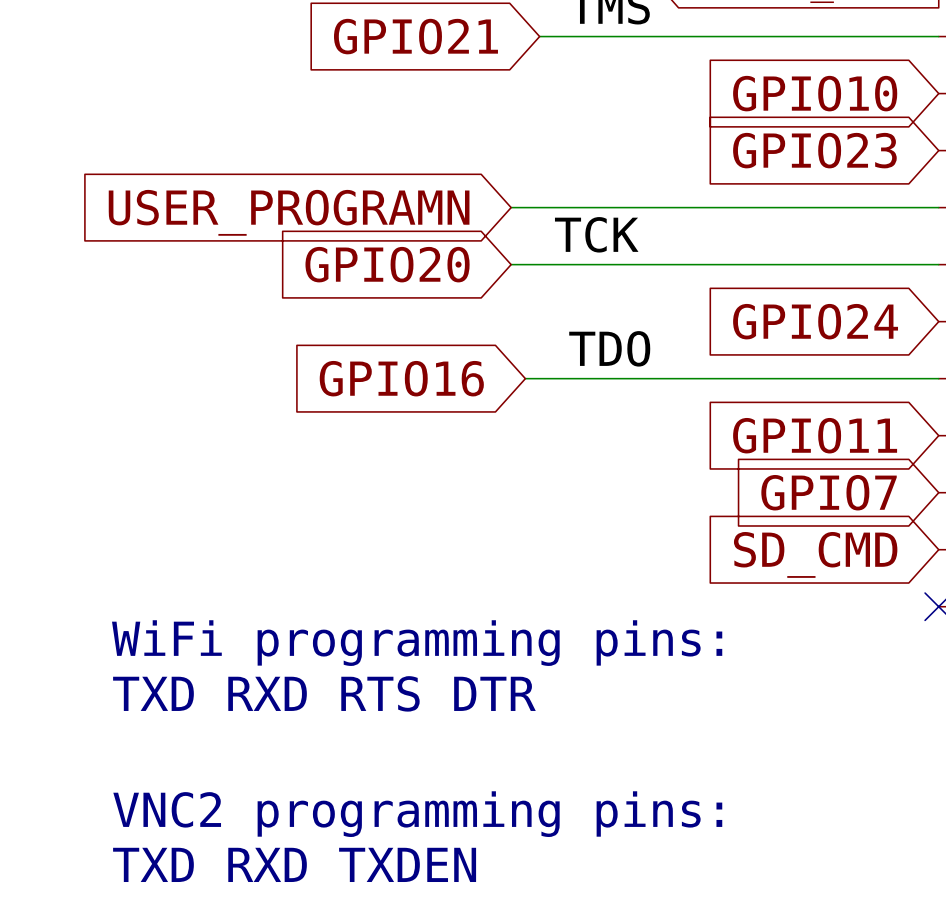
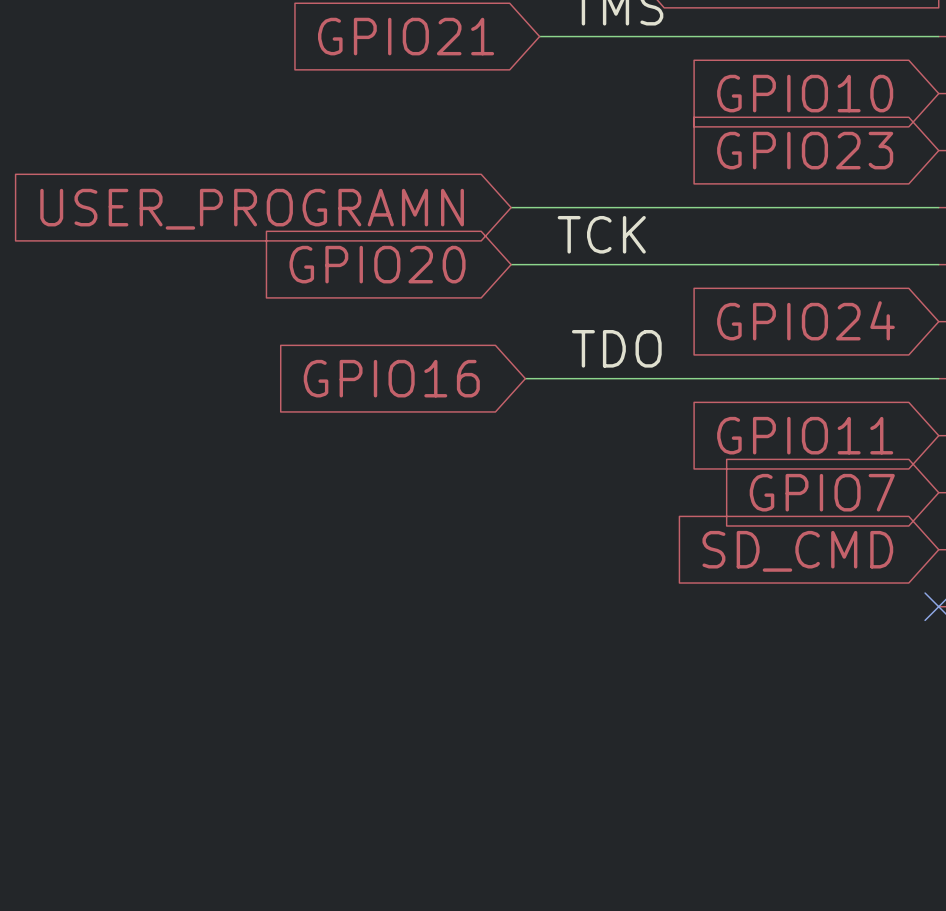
text: WiFi programming pins: (417, 643) -> none
text: TXD RXD RTS DTR (324, 693) -> none
text: VNC2 programming pins: (417, 814) -> none
text: TXD RXD TXDEN (294, 864) -> none

